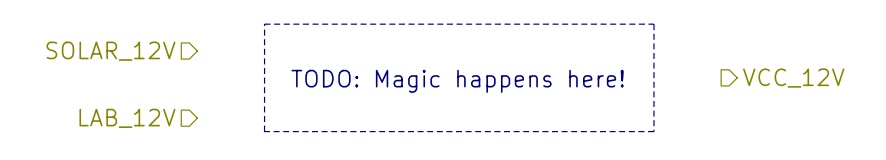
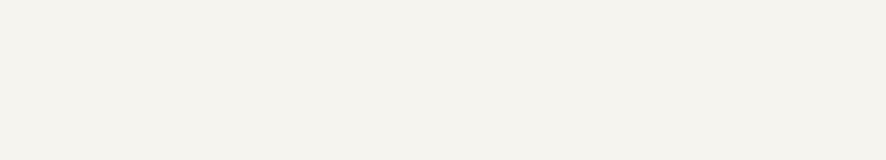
line: (264, 24) (653, 24) (653, 131) (264, 131) (264, 24) -> none
hierarchical label: SOLAR_12V (110, 51) -> none
hierarchical label: VCC_12V (793, 78) -> none
text: TODO: Magic happens here! (457, 81) -> none
hierarchical label: LAB_12V (127, 118) -> none

